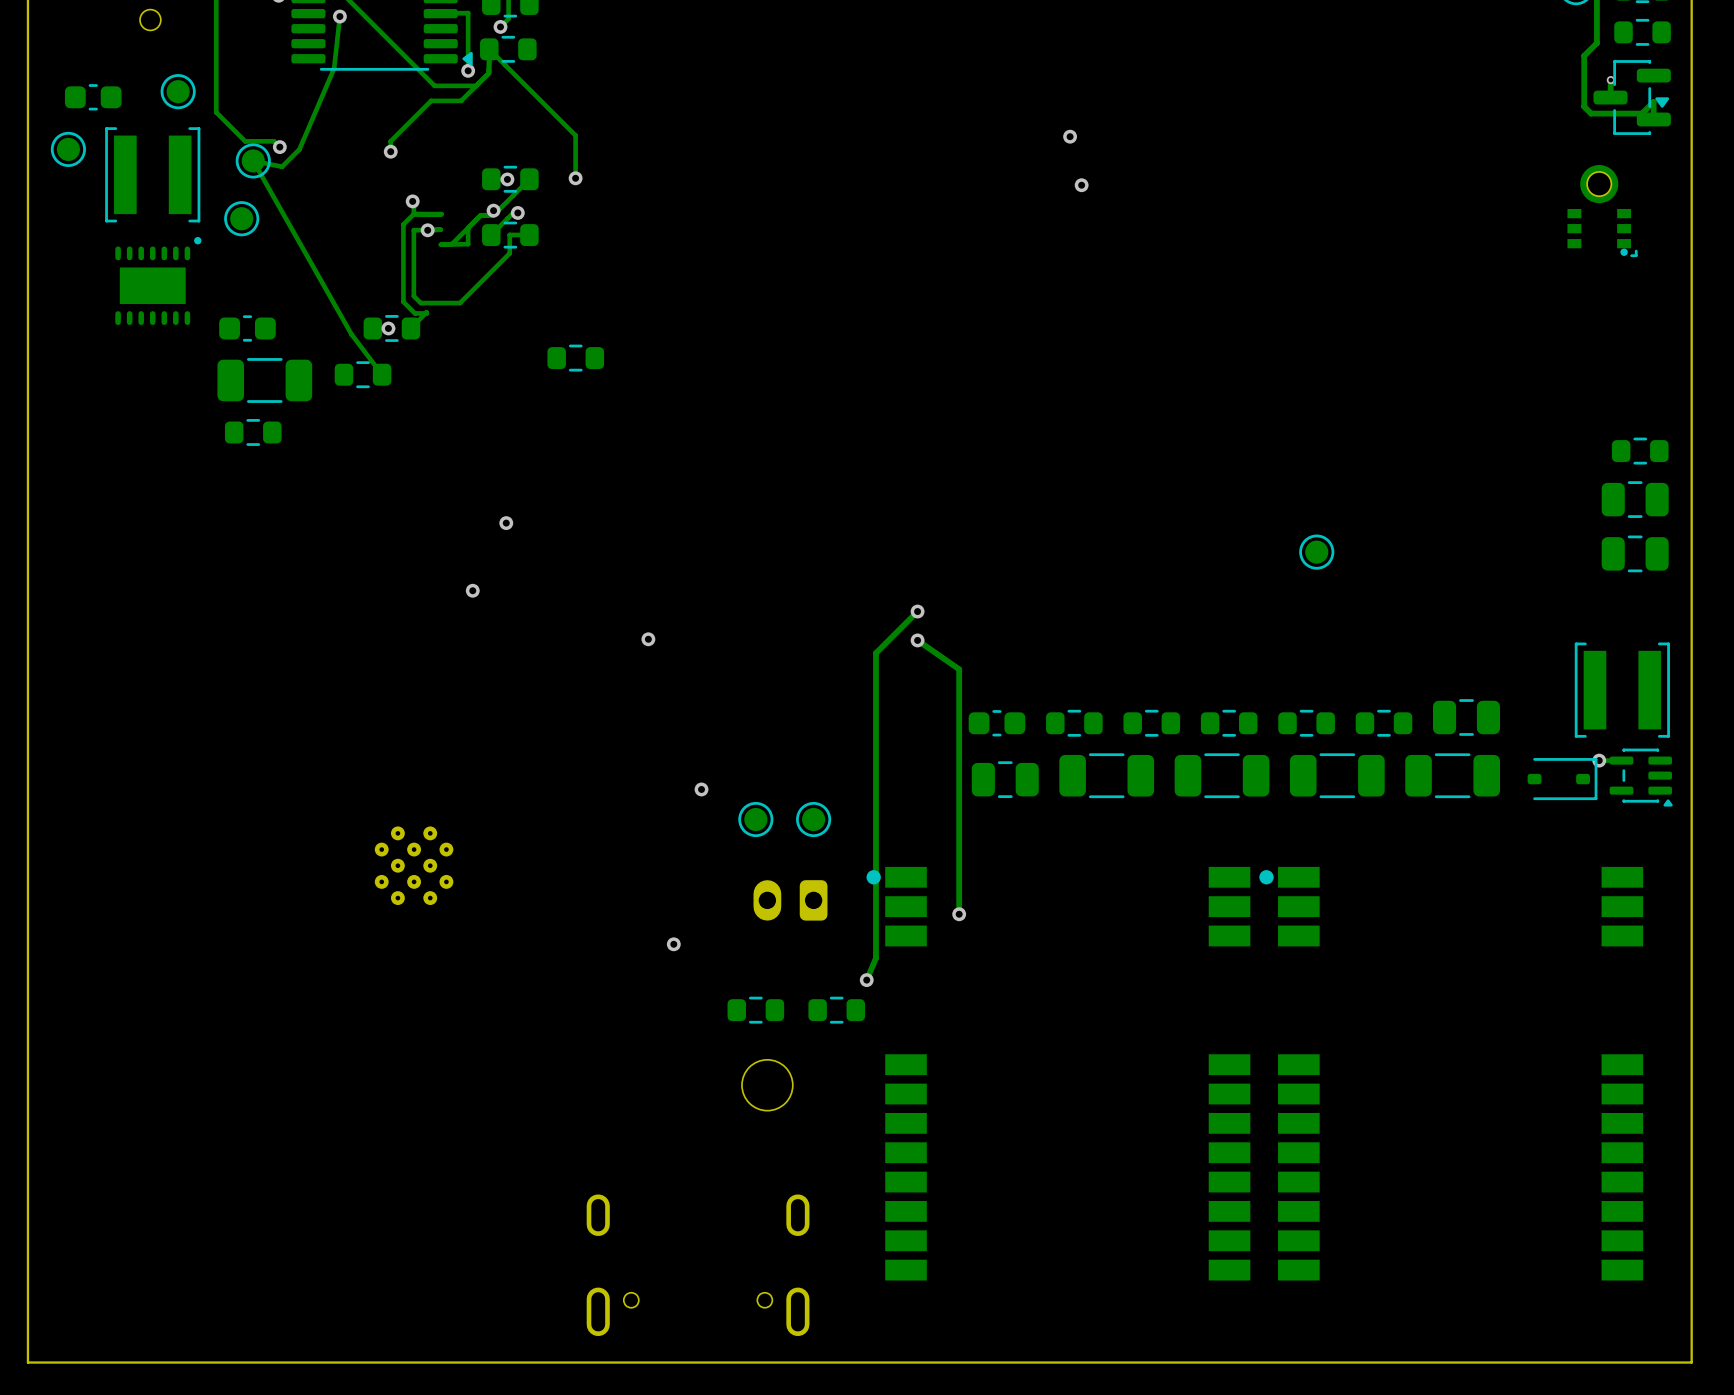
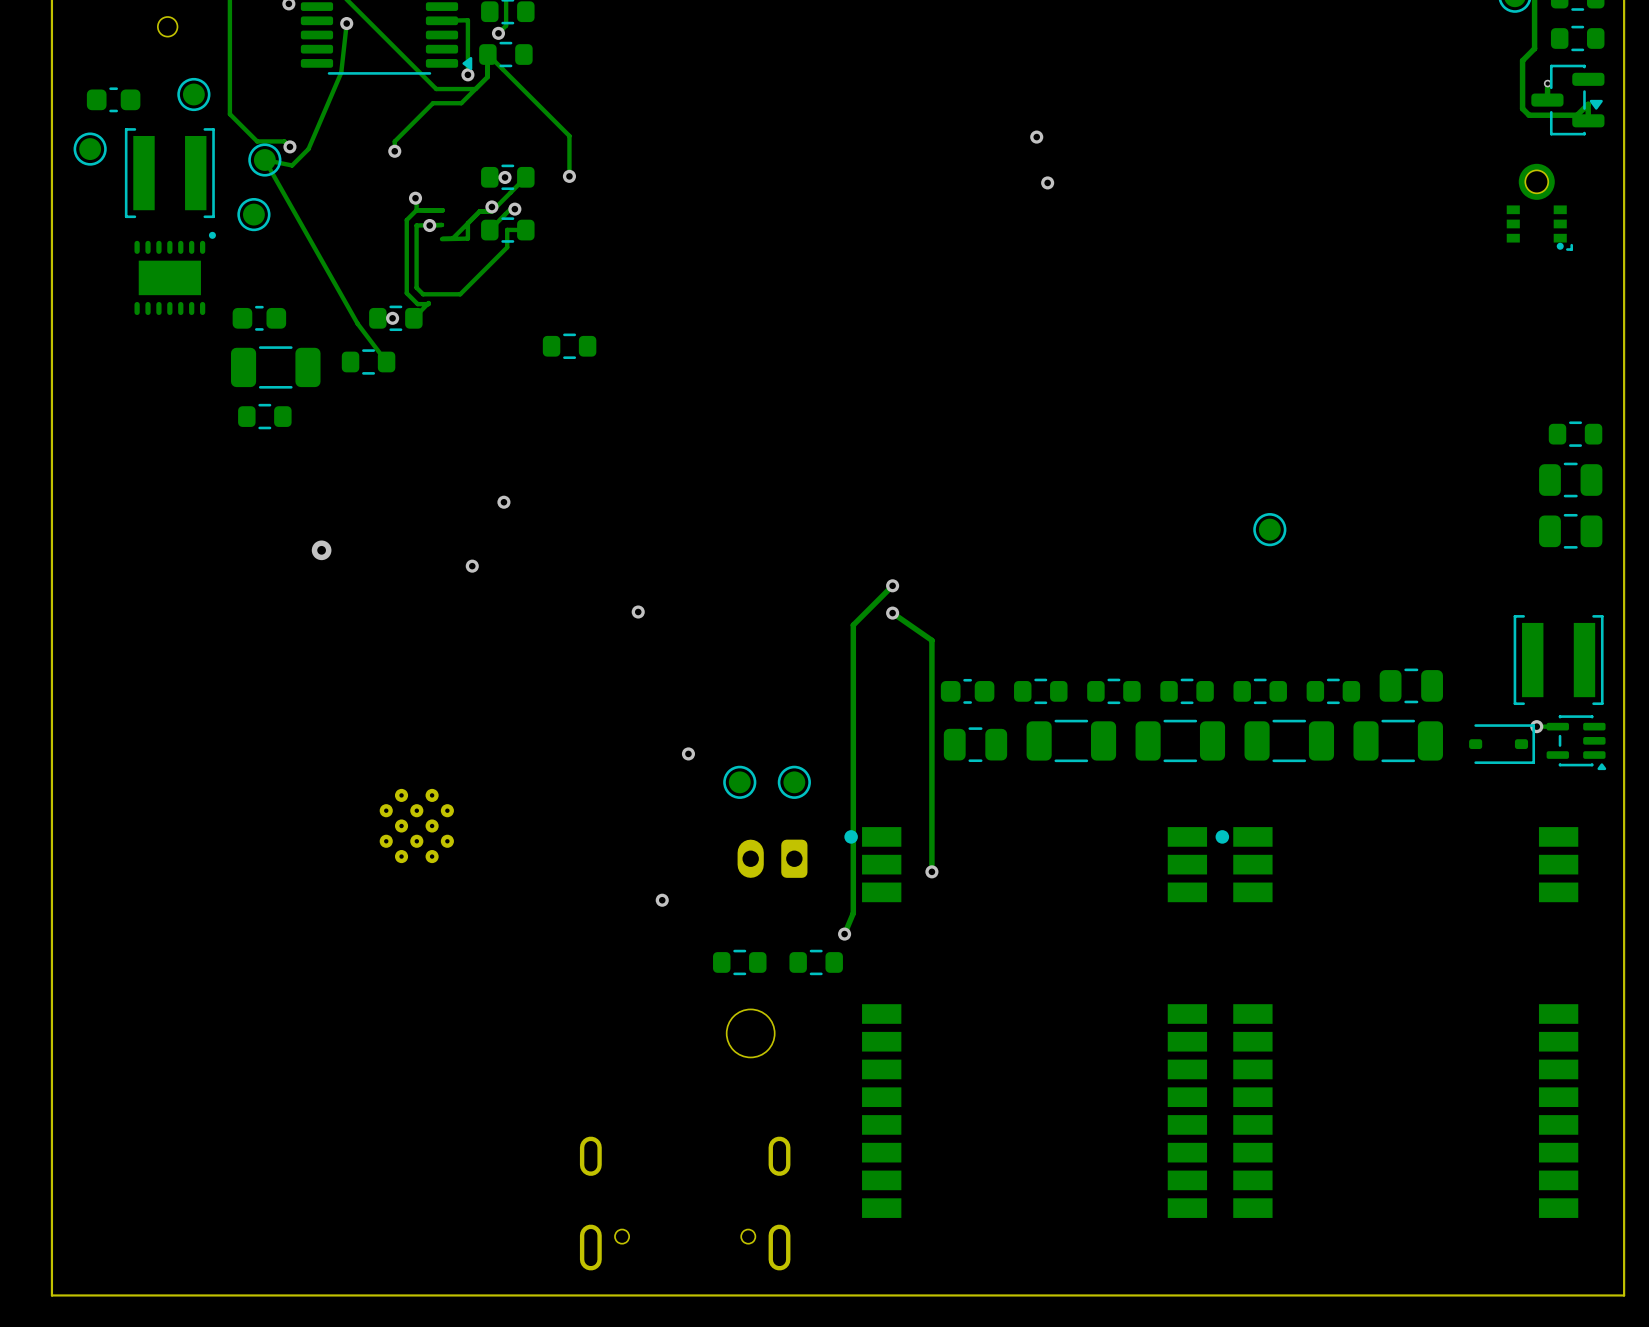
via: none -> (321, 550)

